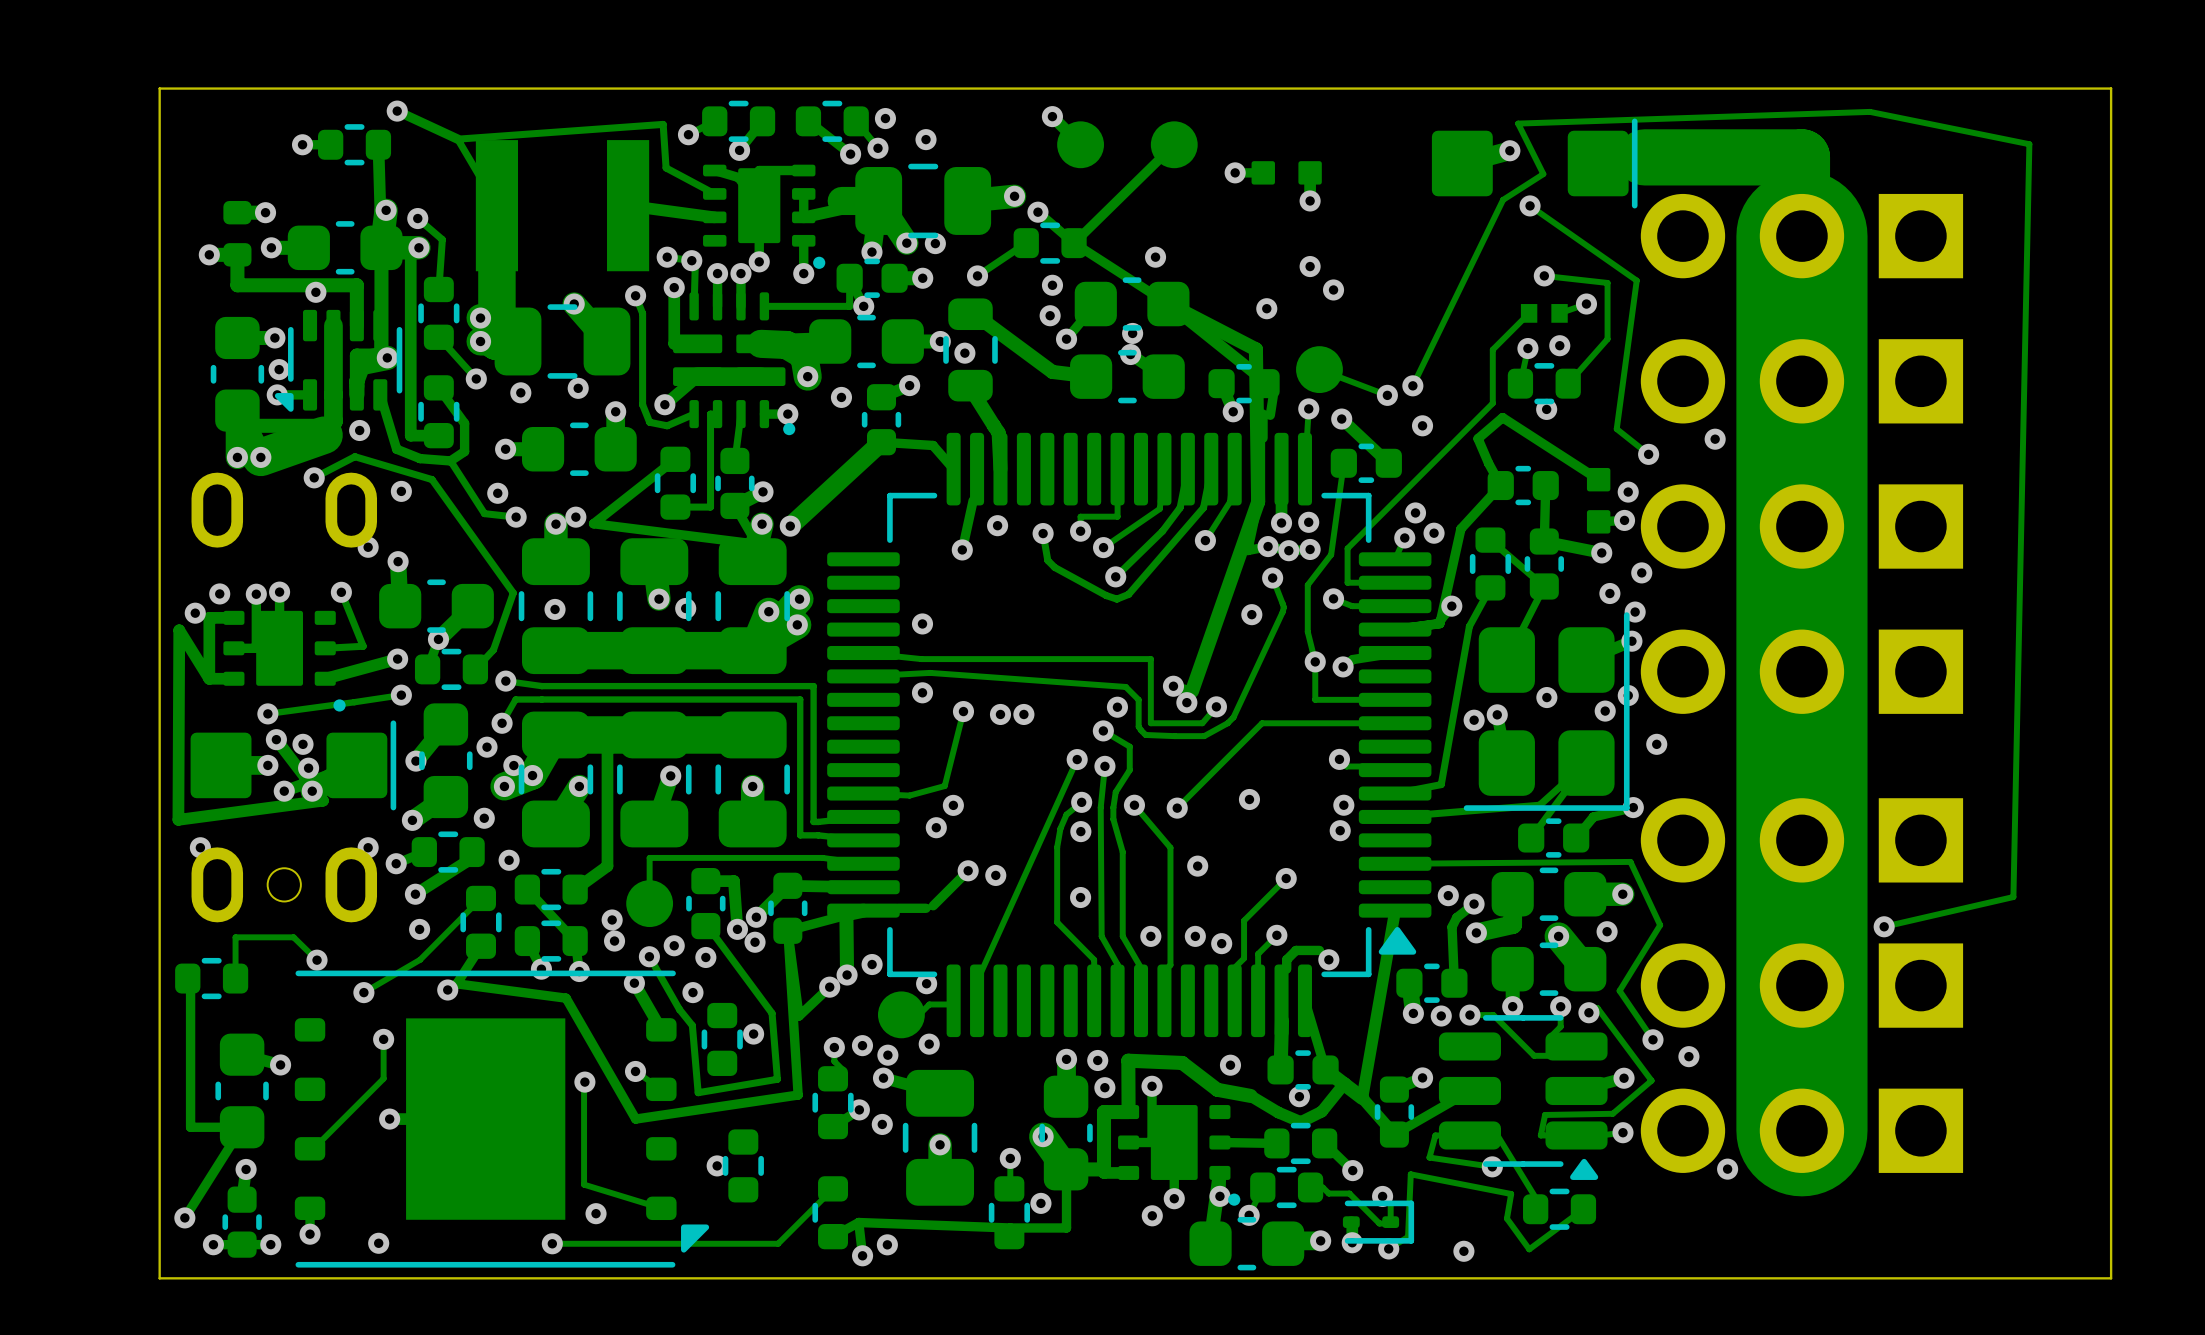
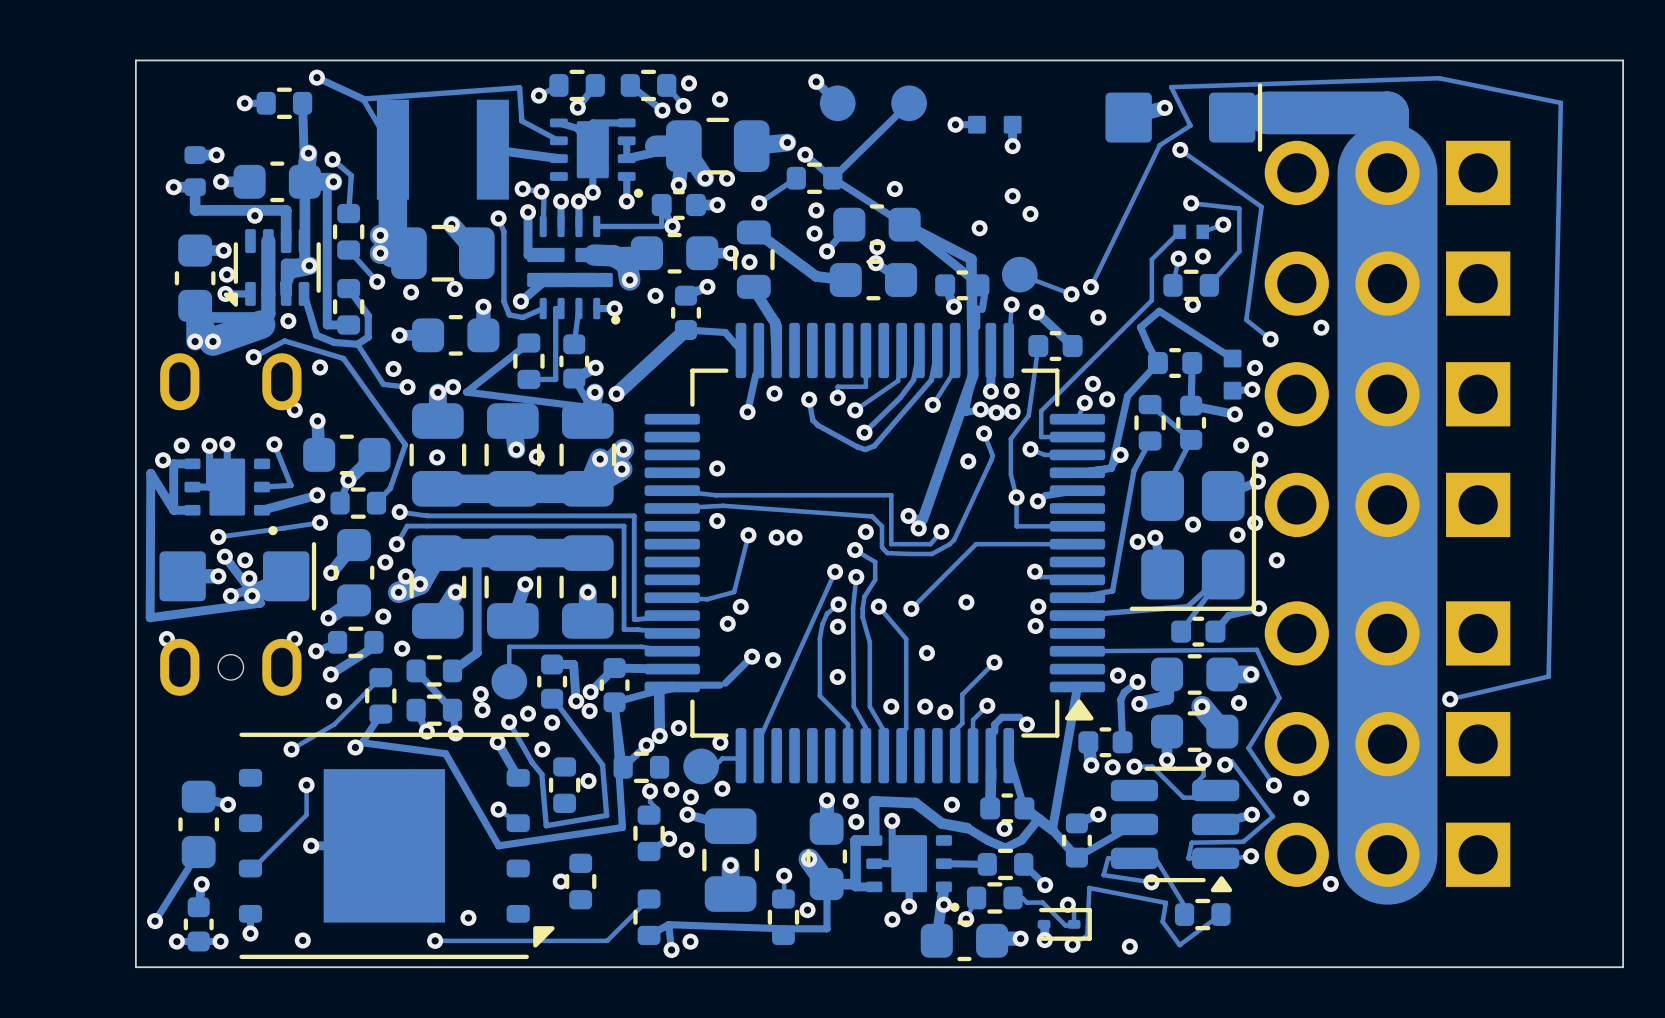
track: (317, 960) (293, 937) (235, 937) (235, 978) -> none
via: (317, 960) -> none
track: (187, 978) (190, 978) (190, 1127) (242, 1127) -> none
part position: (211, 978) -> (641, 767)
track: (584, 1082) (584, 1184) (661, 1208) -> none
via: (584, 1082) -> none

